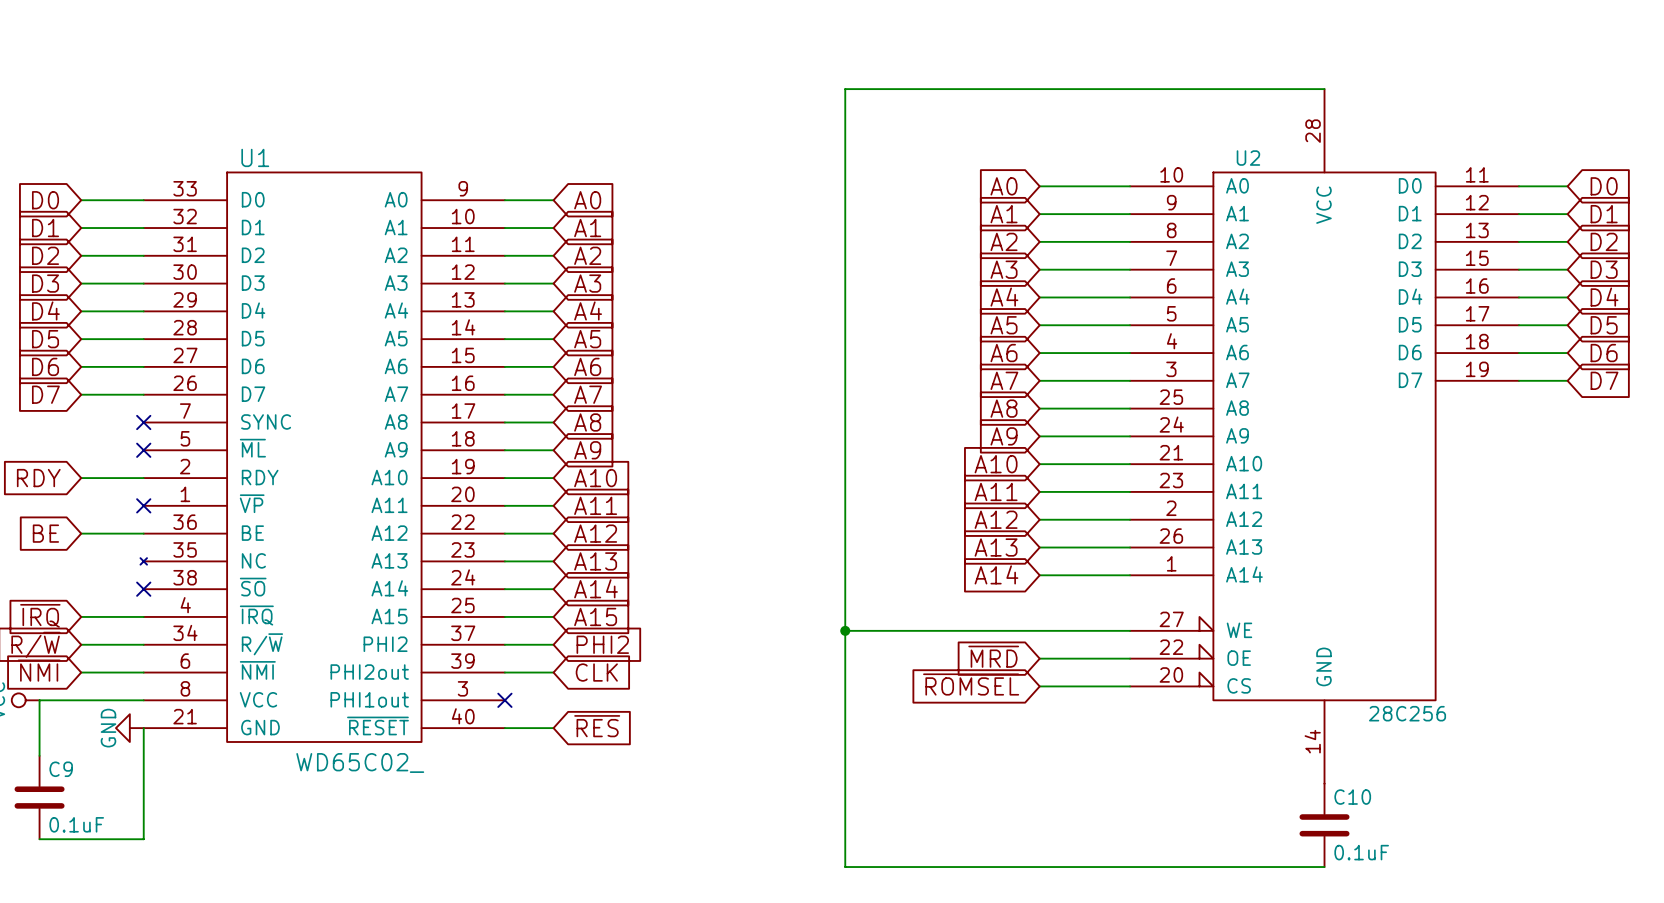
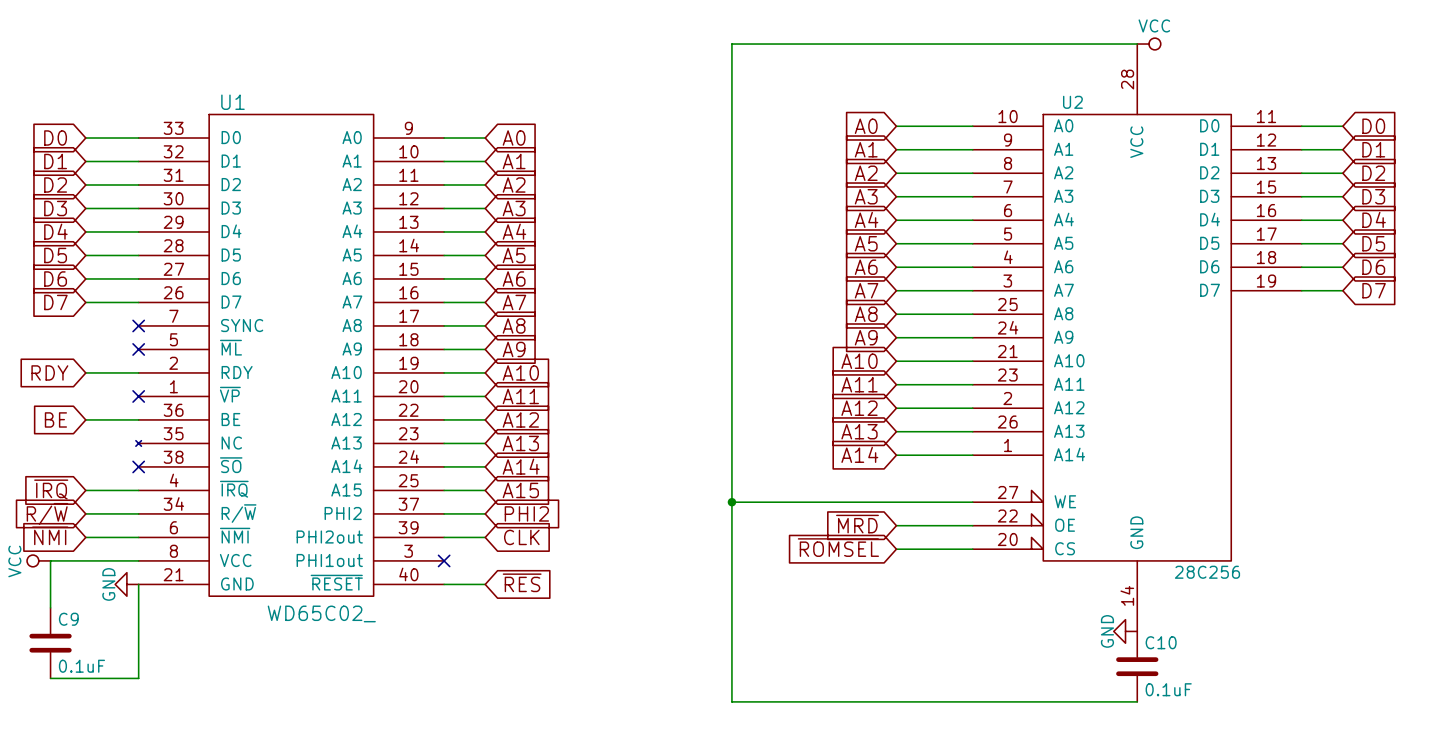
power symbol: none -> VCC (1149, 44)
power symbol: none -> GND (1125, 631)

